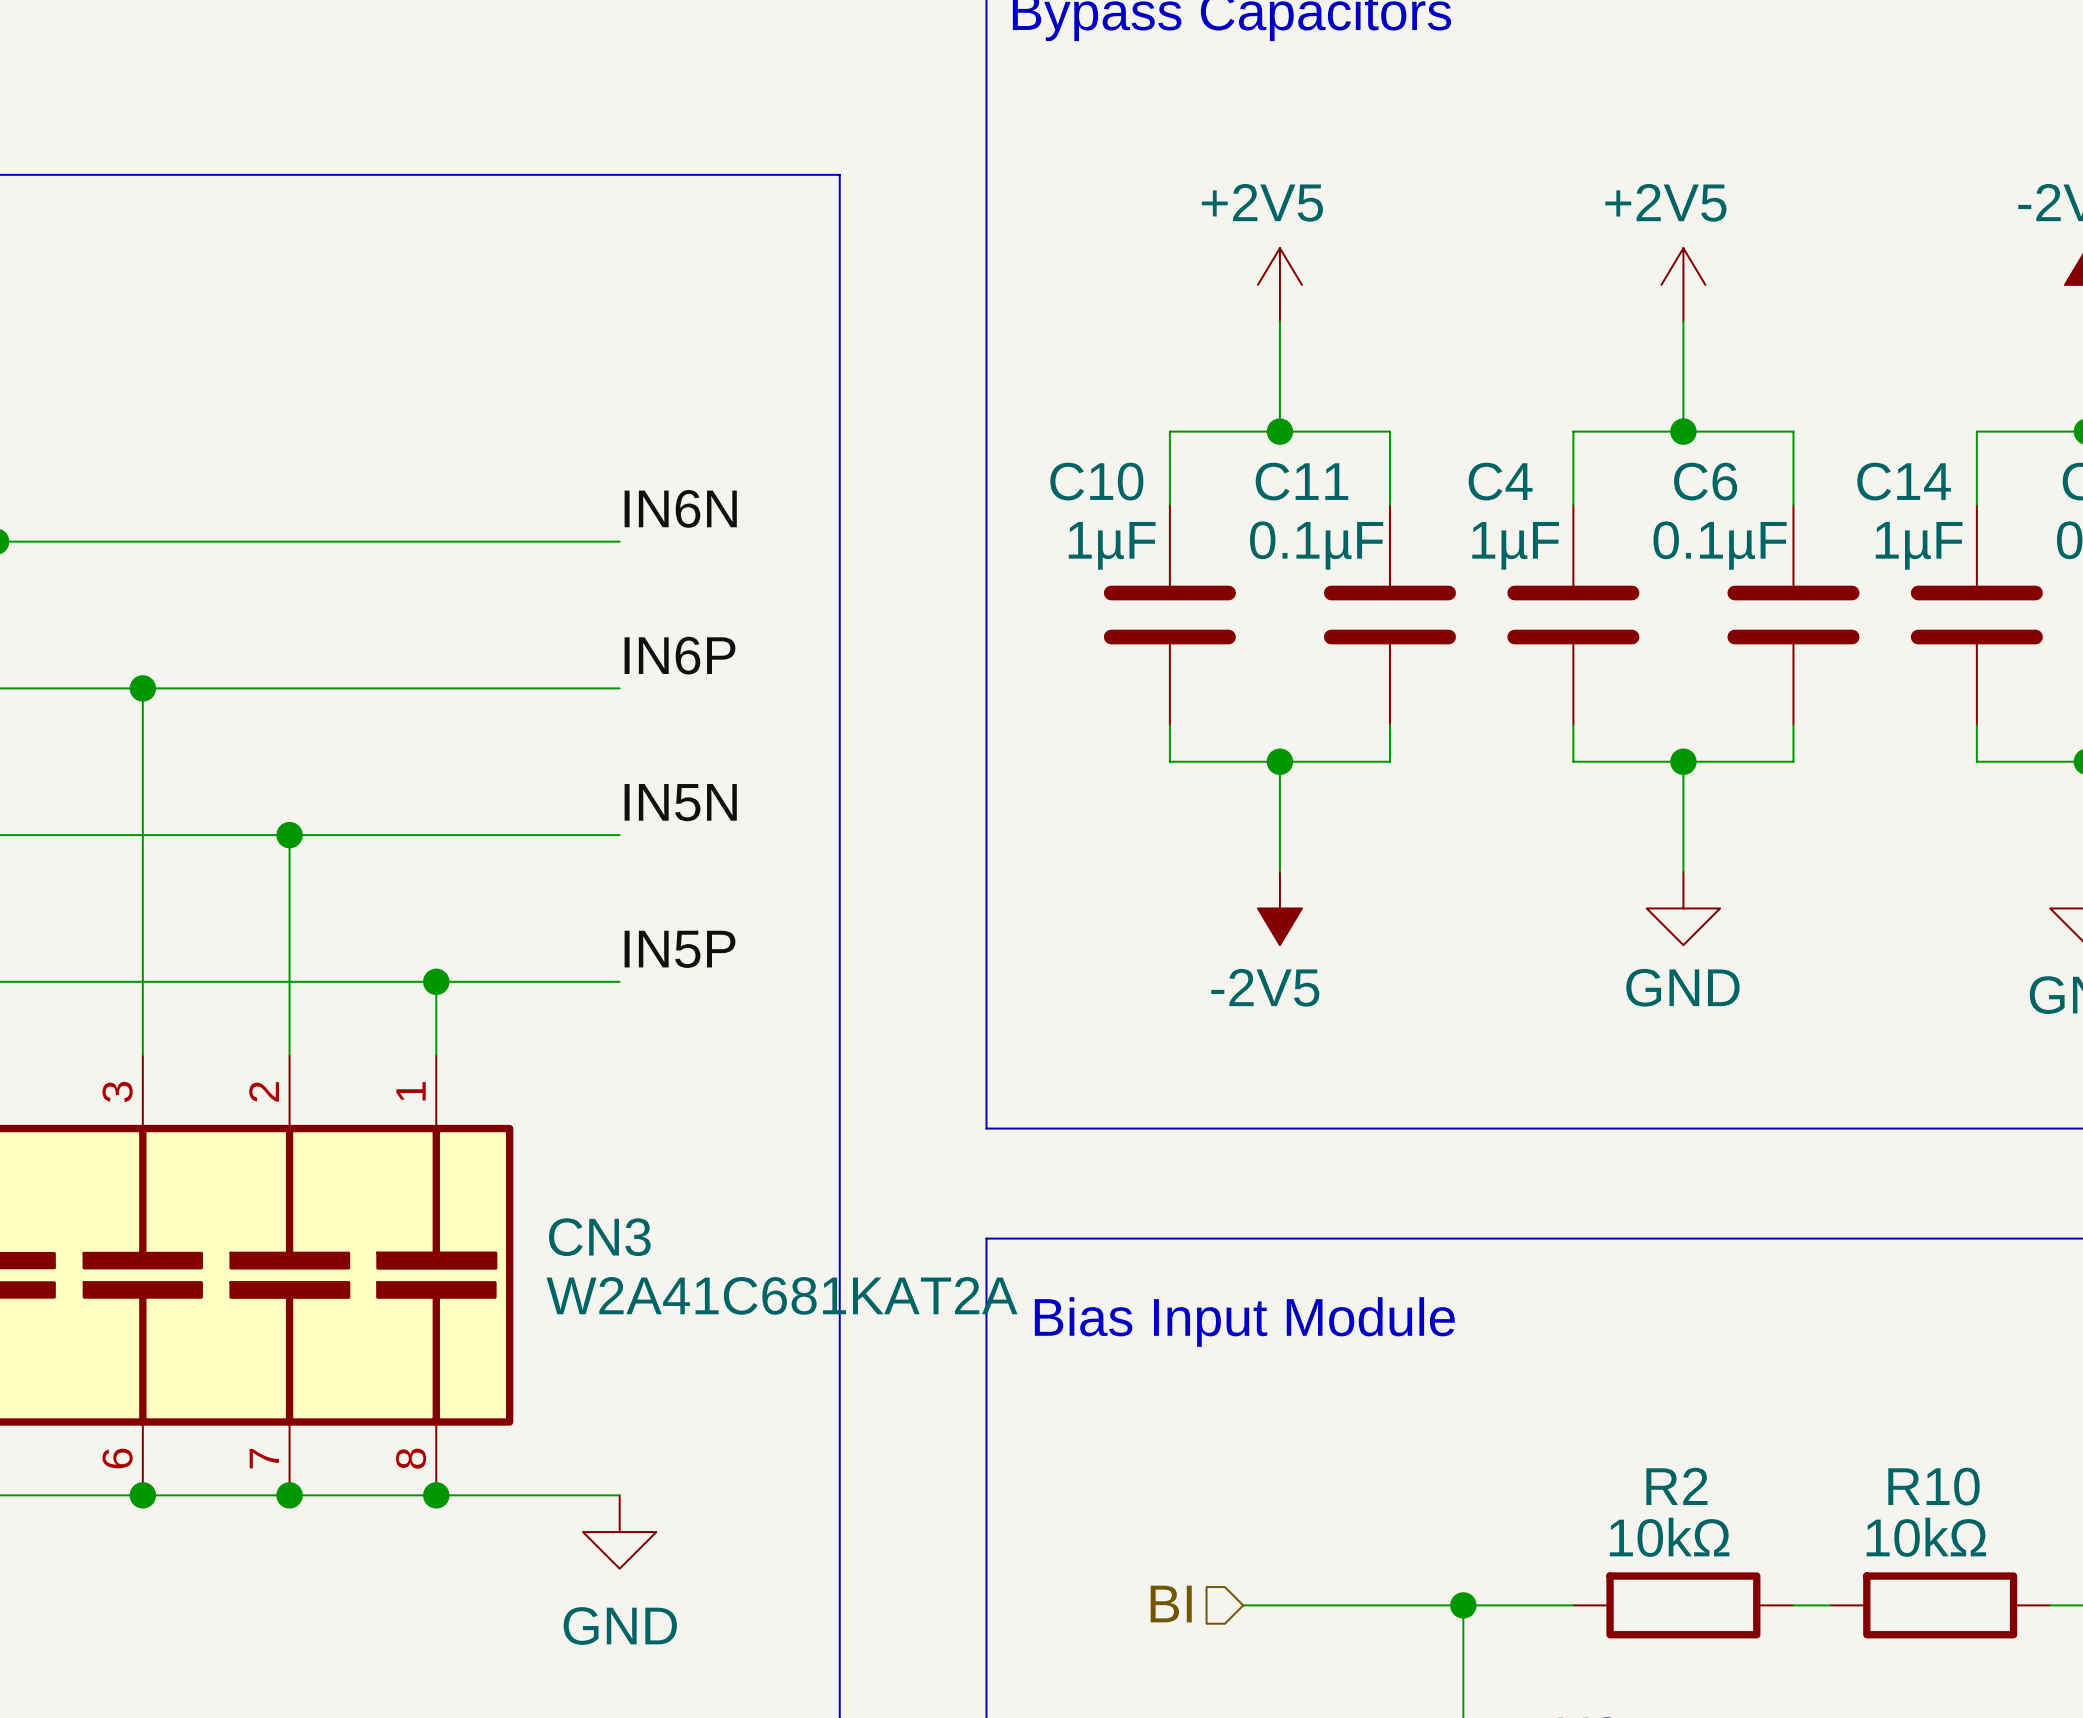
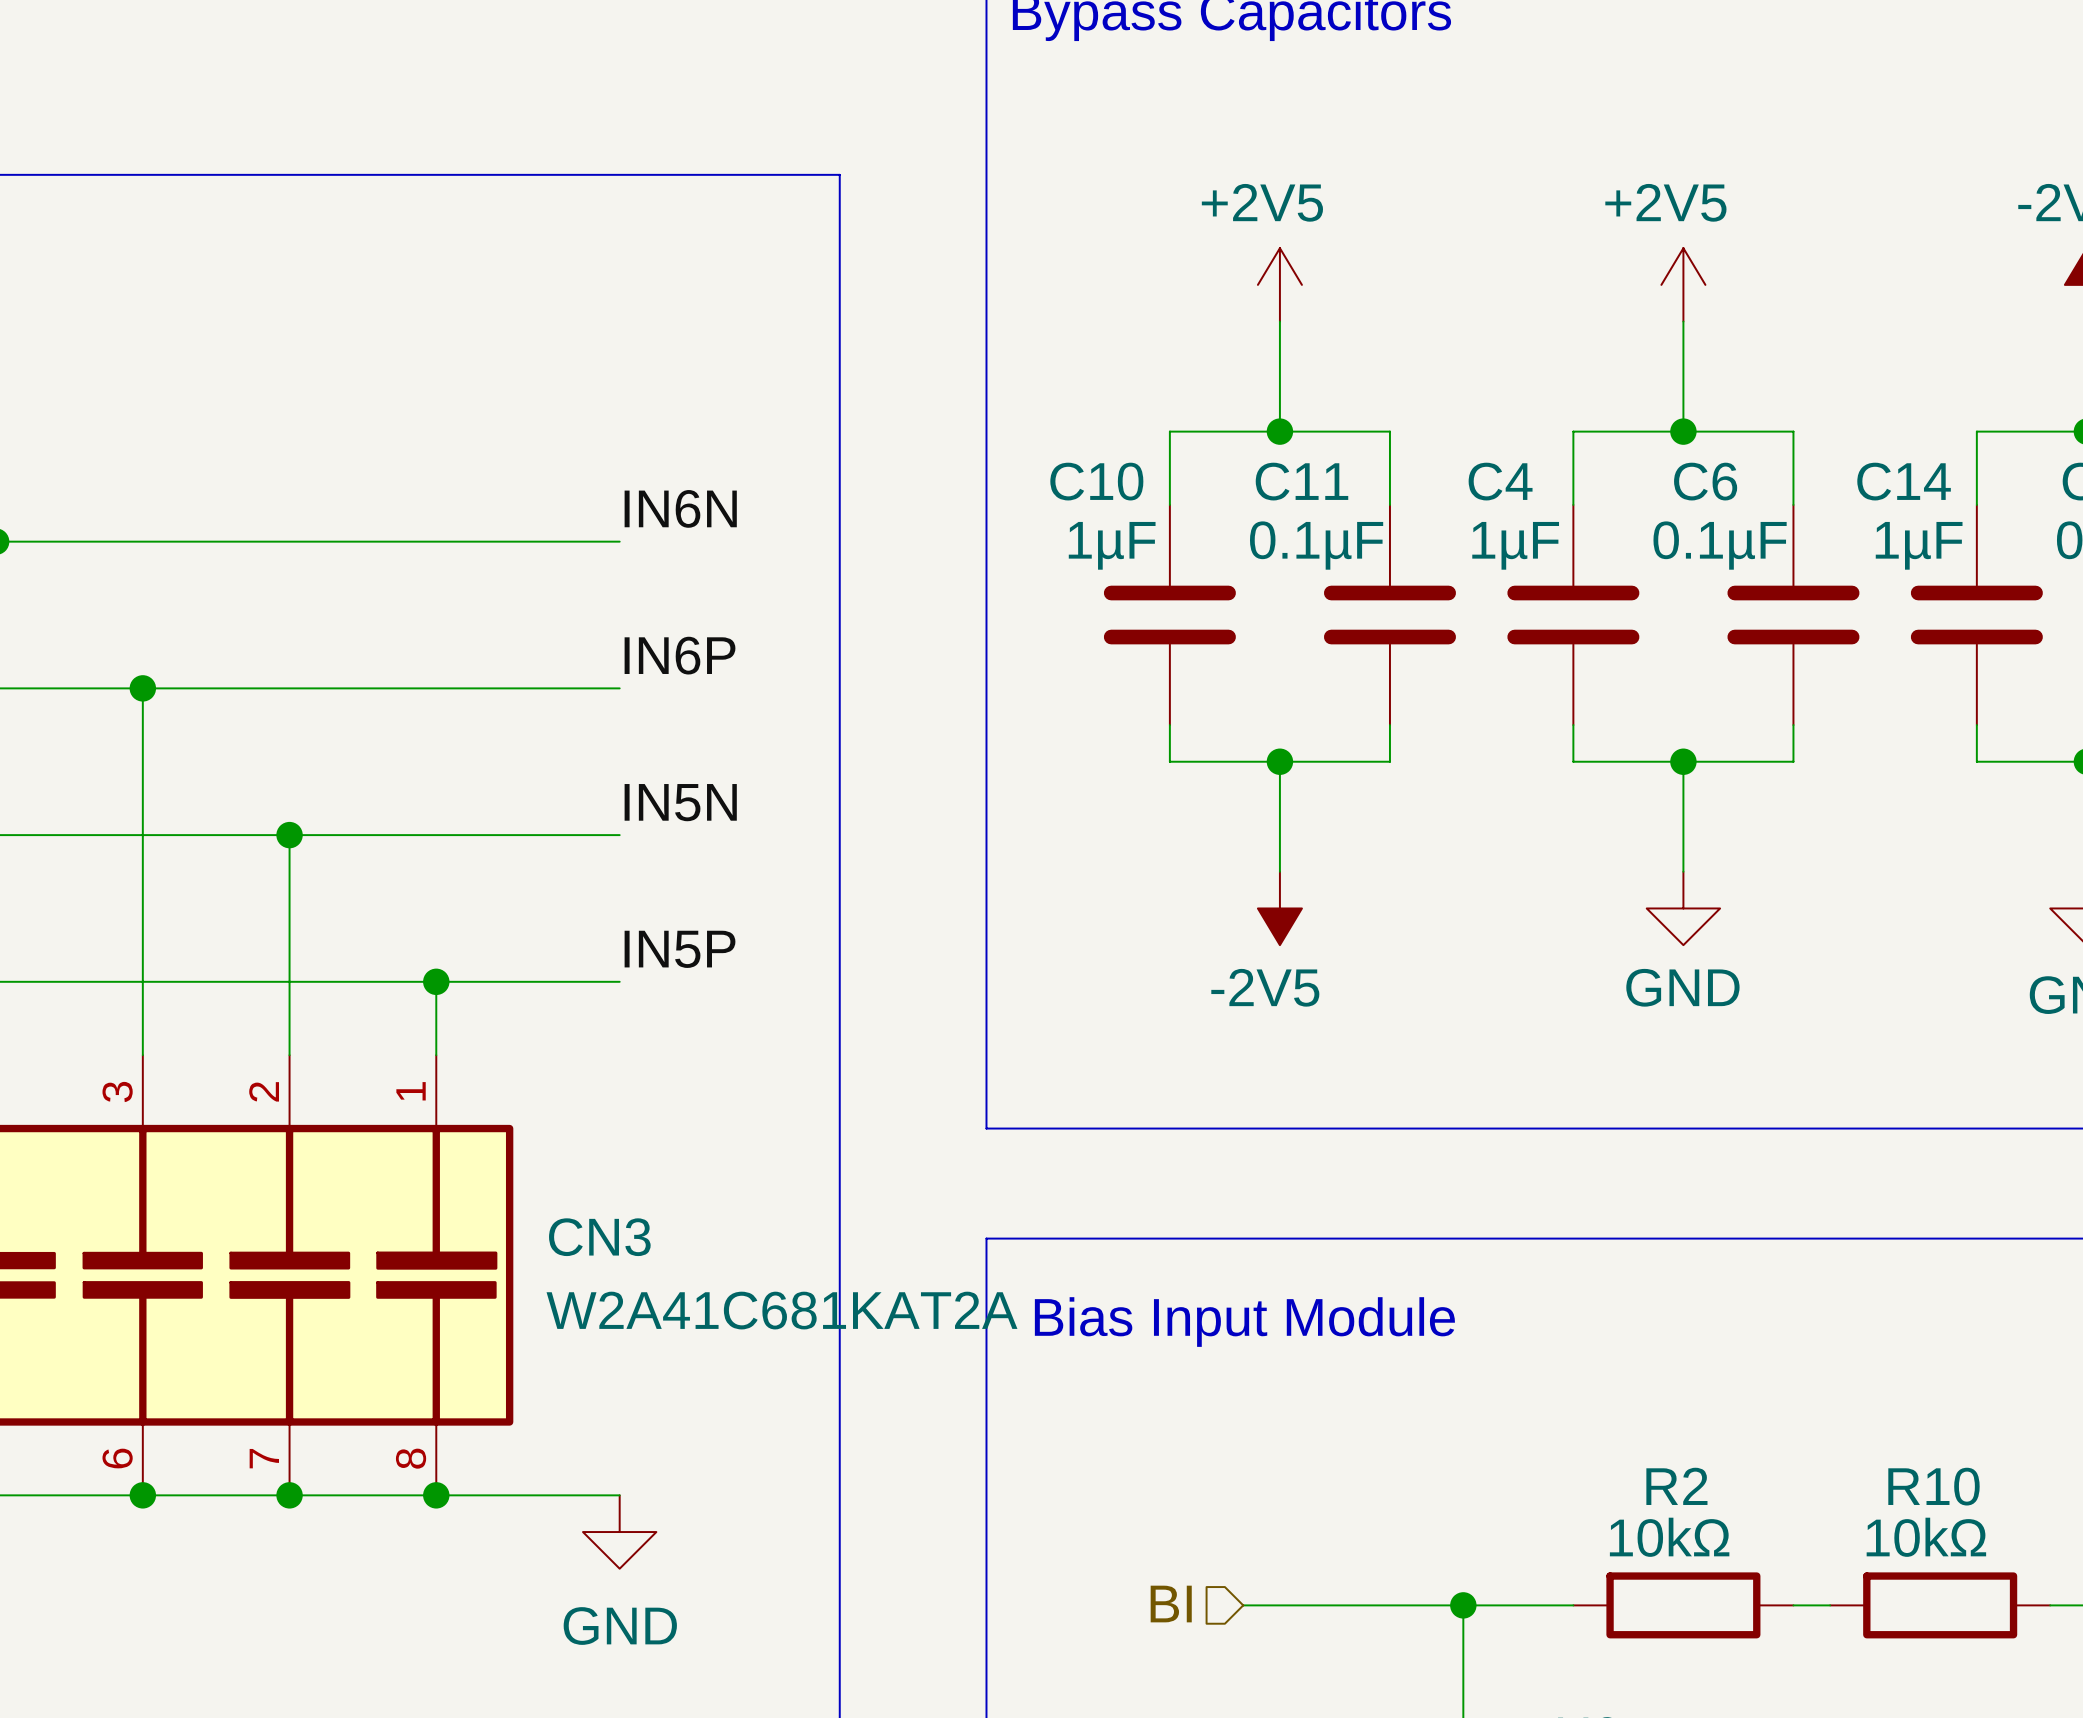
CN3 value position: W2A41C681KAT2A (781, 1295) -> W2A41C681KAT2A (781, 1310)

